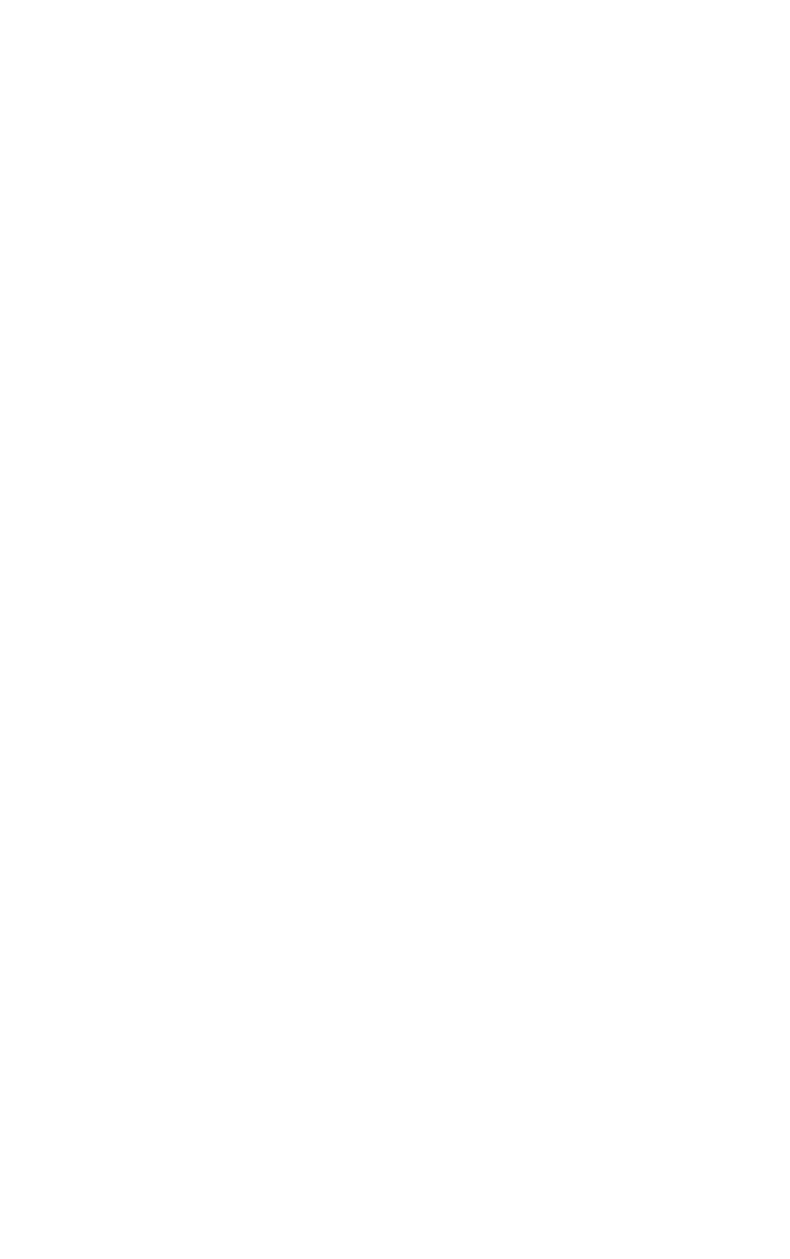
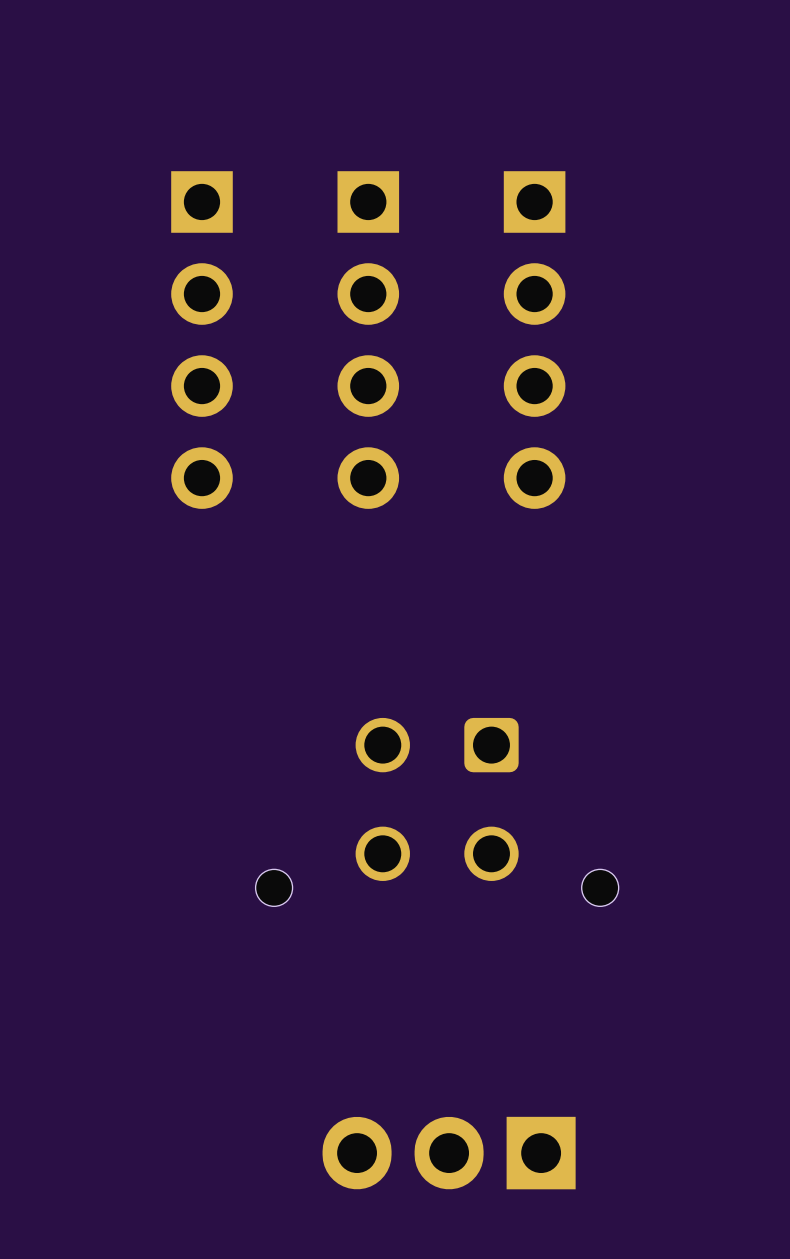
part: none -> (201, 340)
part: none -> (368, 340)
part: none -> (534, 340)
part: none -> (437, 812)
part: none -> (449, 1153)

